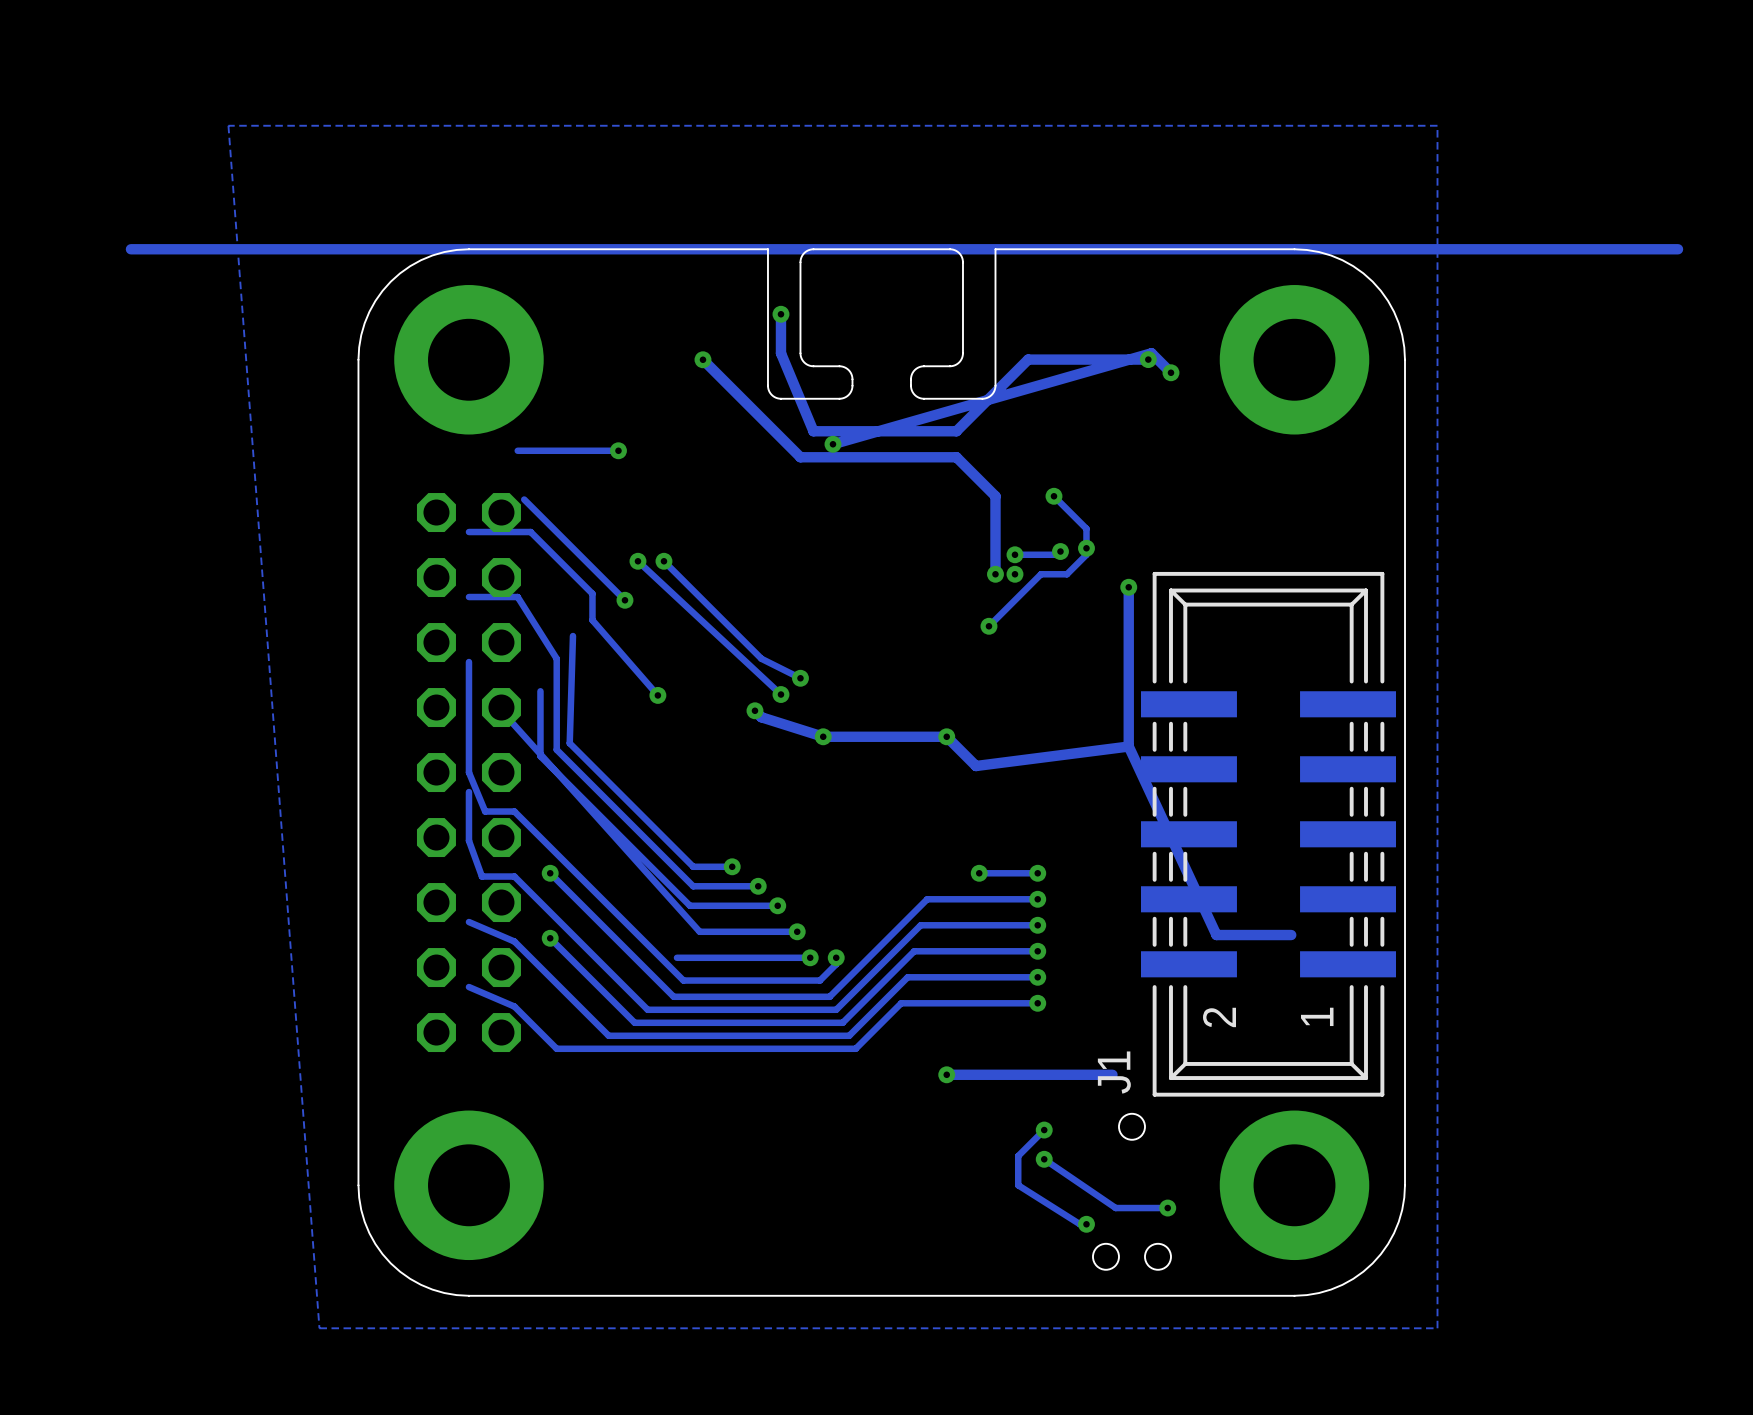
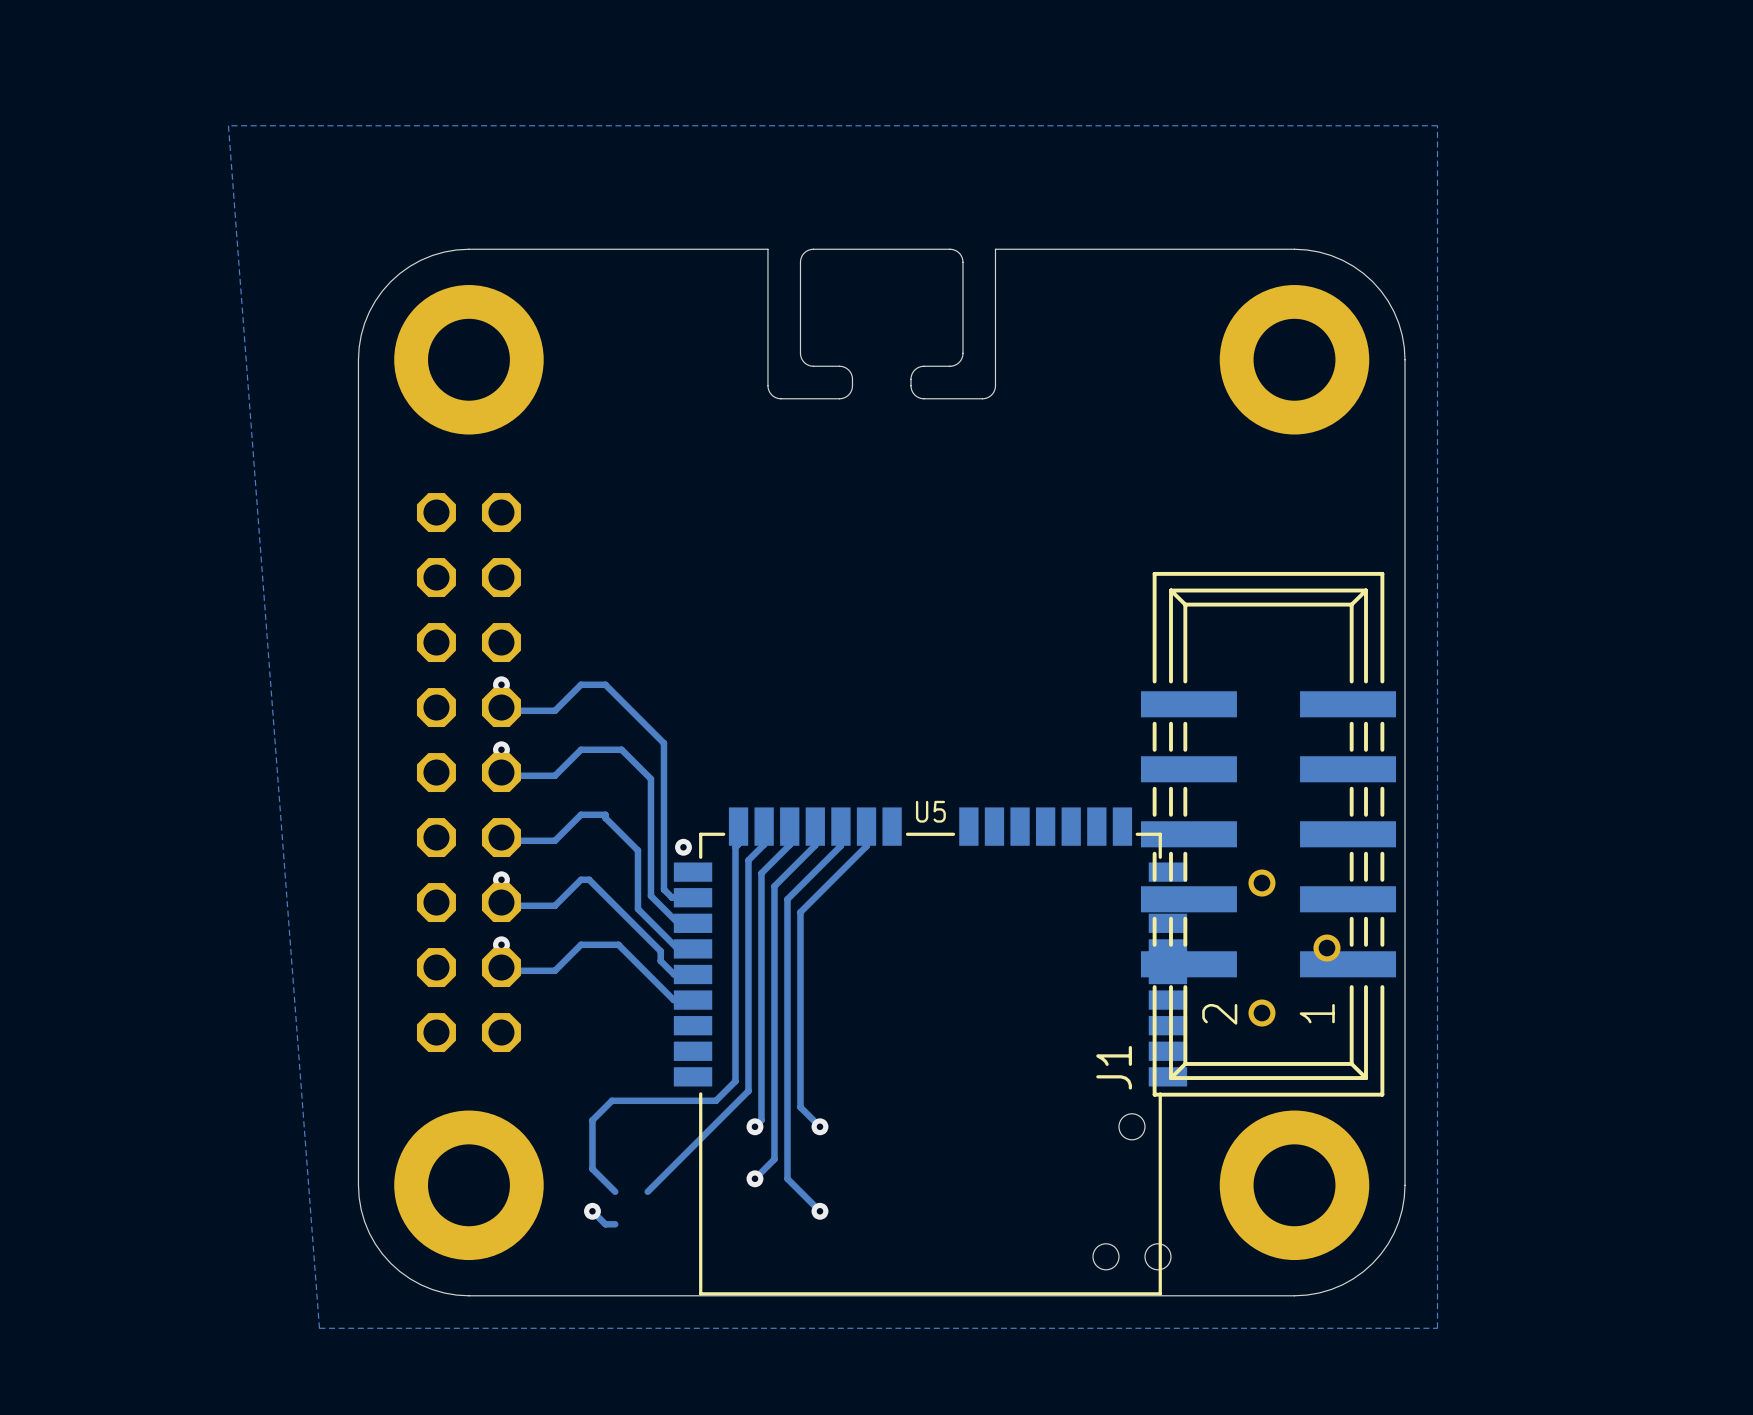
track: (1678, 249) (130, 249) -> none
track: (780, 314) (780, 353) (813, 431) (956, 431) (1028, 359) (1148, 359) -> none
via: (780, 314) -> none
track: (702, 359) (800, 457) (956, 457) (995, 496) (995, 574) -> none
via: (702, 359) -> none
via: (1148, 359) -> none
track: (1170, 372) (1151, 353) (832, 444) -> none
via: (1170, 372) -> none
via: (832, 444) -> none
track: (618, 450) (517, 450) -> none
via: (618, 450) -> none
track: (1053, 496) (1086, 528) (1086, 554) (1066, 574) (1040, 574) (988, 626) -> none
via: (1053, 496) -> none
track: (524, 499) (624, 600) -> none
track: (468, 532) (530, 532) (592, 593) (592, 620) (657, 695) -> none
via: (1086, 548) -> none
track: (1060, 551) (1057, 554) (1014, 554) -> none
via: (1060, 551) -> none
via: (1014, 554) -> none
track: (637, 561) (780, 694) -> none
via: (637, 561) -> none
track: (663, 561) (761, 658) (800, 678) -> none
via: (663, 561) -> none
via: (995, 574) -> none
via: (1014, 574) -> none
track: (1128, 587) (1128, 746) -> none
via: (1128, 587) -> none
track: (468, 597) (517, 597) (556, 658) (556, 749) (693, 886) (758, 886) -> none
via: (624, 600) -> none
via: (988, 626) -> none
track: (572, 636) (569, 743) (693, 866) (732, 866) -> none
track: (468, 662) (468, 772) (485, 811) (514, 811) (683, 980) (819, 980) (836, 964) (836, 957) -> none
via: (800, 678) -> none
via: none -> (501, 684)
track: (540, 691) (540, 756) (689, 905) (777, 905) -> none
via: (780, 694) -> none
via: (657, 695) -> none
track: none -> (488, 710) (554, 710) (580, 684) (605, 684) (663, 743) (663, 889) (672, 897) (693, 897)
track: (501, 710) (699, 931) (797, 931) -> none
track: (754, 710) (761, 717) (823, 736) (946, 736) (975, 766) (1128, 746) -> none
via: (754, 710) -> none
via: (823, 736) -> none
via: (946, 736) -> none
track: (1128, 746) (1216, 935) (1291, 935) -> none
via: none -> (501, 749)
track: none -> (488, 775) (554, 775) (580, 749) (621, 749) (650, 779) (650, 896) (678, 923) (693, 923)
track: (468, 792) (468, 840) (481, 876) (514, 876) (647, 1009) (836, 1009) (920, 925) (1037, 925) -> none
track: none -> (738, 826) (738, 844) (735, 847) (735, 1081) (715, 1100) (611, 1100) (592, 1120) (592, 1169) (615, 1191)
track: none -> (764, 826) (764, 844) (748, 860) (748, 1091) (647, 1191)
track: none -> (789, 826) (789, 845) (761, 873) (761, 1120) (754, 1126)
track: none -> (815, 826) (815, 845) (774, 886) (774, 1159) (754, 1178)
track: none -> (840, 826) (840, 845) (787, 899) (787, 1178) (819, 1211)
track: none -> (866, 826) (866, 846) (800, 912) (800, 1107) (819, 1126)
track: none -> (488, 840) (554, 840) (580, 814) (605, 814) (605, 818) (637, 850) (637, 909) (677, 948) (693, 948)
via: none -> (683, 847)
via: (732, 866) -> none
track: (550, 873) (673, 996) (829, 996) (927, 899) (1037, 899) -> none
via: (550, 873) -> none
via: (979, 873) -> none
track: (1037, 873) (979, 873) -> none
via: (1037, 873) -> none
via: none -> (501, 879)
via: (758, 886) -> none
via: (1037, 899) -> none
track: none -> (488, 905) (554, 905) (580, 879) (589, 879) (660, 951) (660, 961) (674, 974) (693, 974)
via: (777, 905) -> none
track: (468, 922) (514, 941) (608, 1035) (849, 1035) (907, 977) (1037, 977) -> none
via: (1037, 925) -> none
via: (797, 931) -> none
track: (550, 938) (634, 1022) (842, 1022) (914, 951) (1037, 951) -> none
via: (550, 938) -> none
via: none -> (501, 944)
part: none -> (1294, 948)
via: (1037, 951) -> none
track: (810, 957) (676, 957) -> none
via: (810, 957) -> none
via: (836, 957) -> none
track: none -> (488, 970) (554, 970) (580, 944) (618, 944) (673, 1000) (693, 1000)
via: (1037, 977) -> none
track: (468, 987) (514, 1006) (556, 1048) (855, 1048) (901, 1003) (1037, 1003) -> none
via: (1037, 1003) -> none
U5: none -> (930, 1051)
via: (946, 1074) -> none
track: (1112, 1074) (946, 1074) -> none
via: none -> (754, 1126)
via: none -> (819, 1126)
track: (1044, 1130) (1018, 1156) (1018, 1185) (1079, 1224) (1086, 1224) -> none
via: (1044, 1130) -> none
track: (1044, 1159) (1115, 1208) (1167, 1208) -> none
via: (1044, 1159) -> none
via: none -> (754, 1178)
via: (1167, 1208) -> none
track: none -> (592, 1211) (605, 1224) (615, 1224)
via: none -> (592, 1211)
via: none -> (819, 1211)
via: (1086, 1224) -> none

